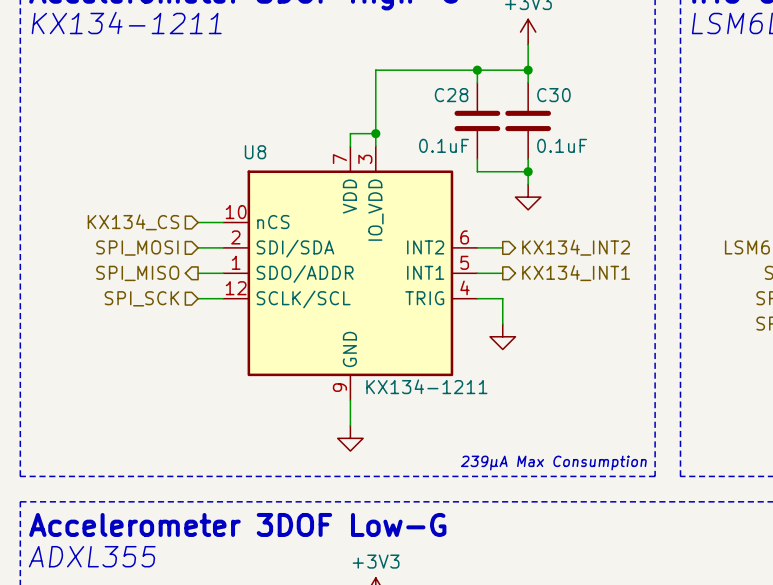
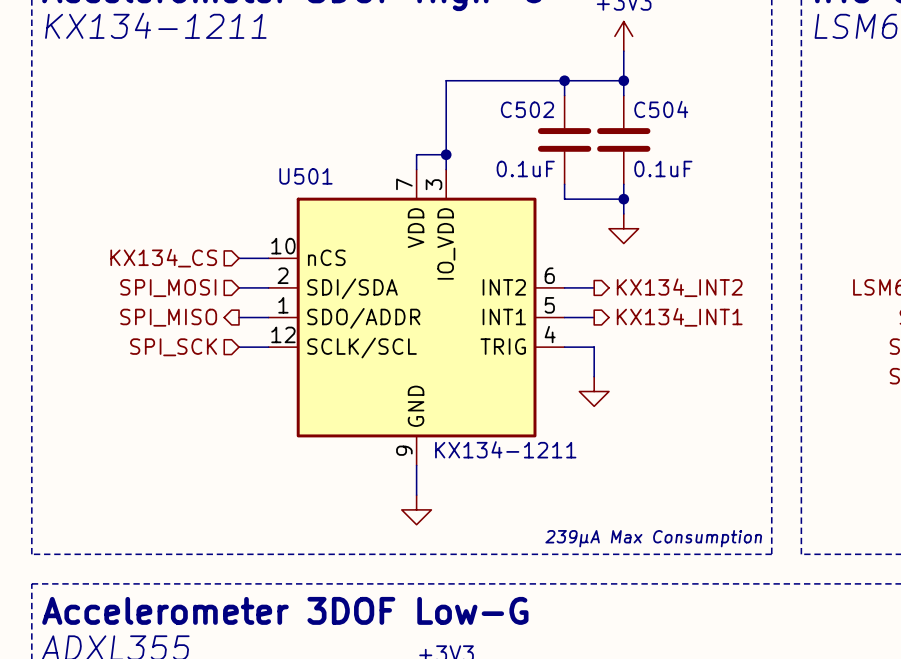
C28 name: C28 (451, 95) -> C502 (527, 109)
C30 name: C30 (553, 95) -> C504 (661, 109)
U8 name: U8 (255, 152) -> U501 (305, 176)

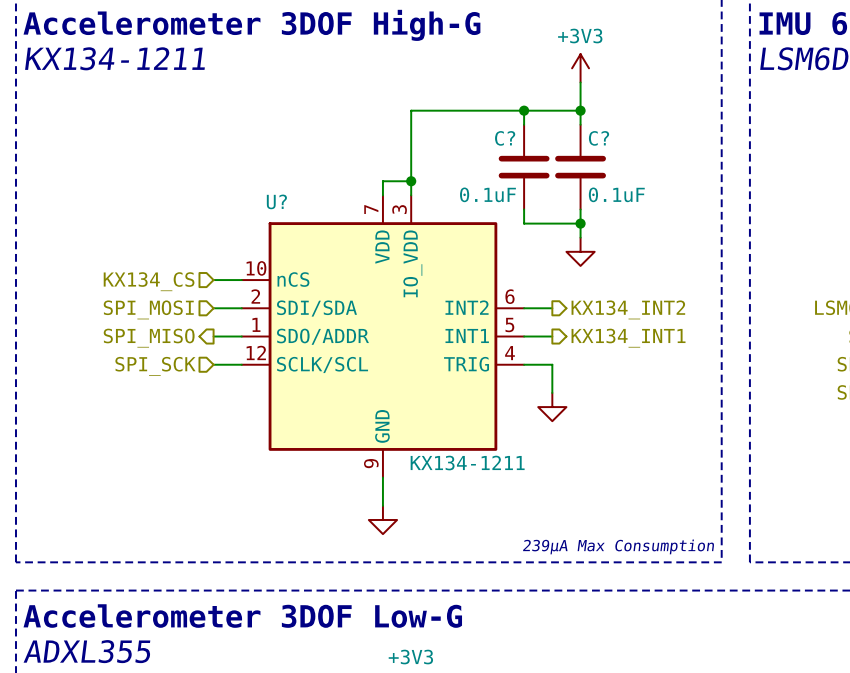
C502 name: C502 (527, 109) -> C? (505, 138)
C504 name: C504 (661, 109) -> C? (599, 138)
U501 name: U501 (305, 176) -> U? (276, 201)

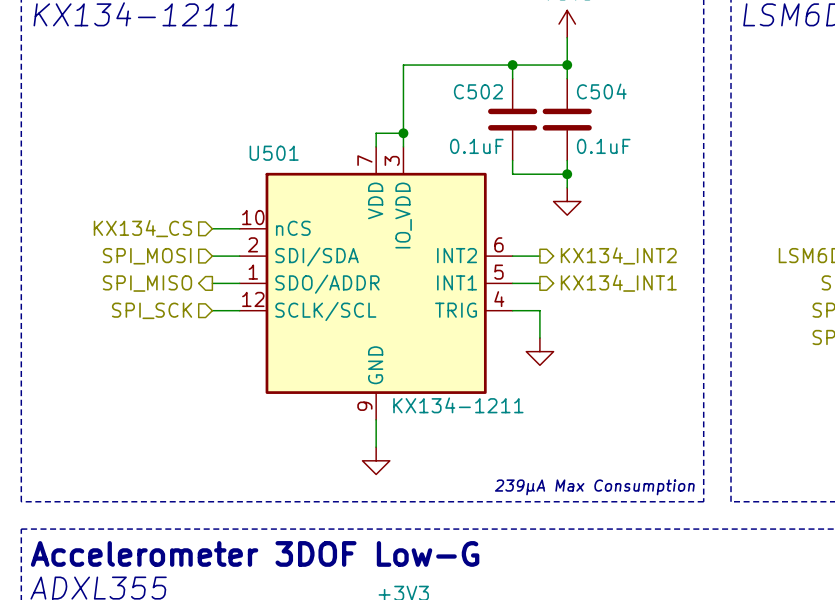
C? name: C? (505, 138) -> C502 (478, 91)
C? name: C? (599, 138) -> C504 (601, 91)
U? name: U? (276, 201) -> U501 (274, 153)

